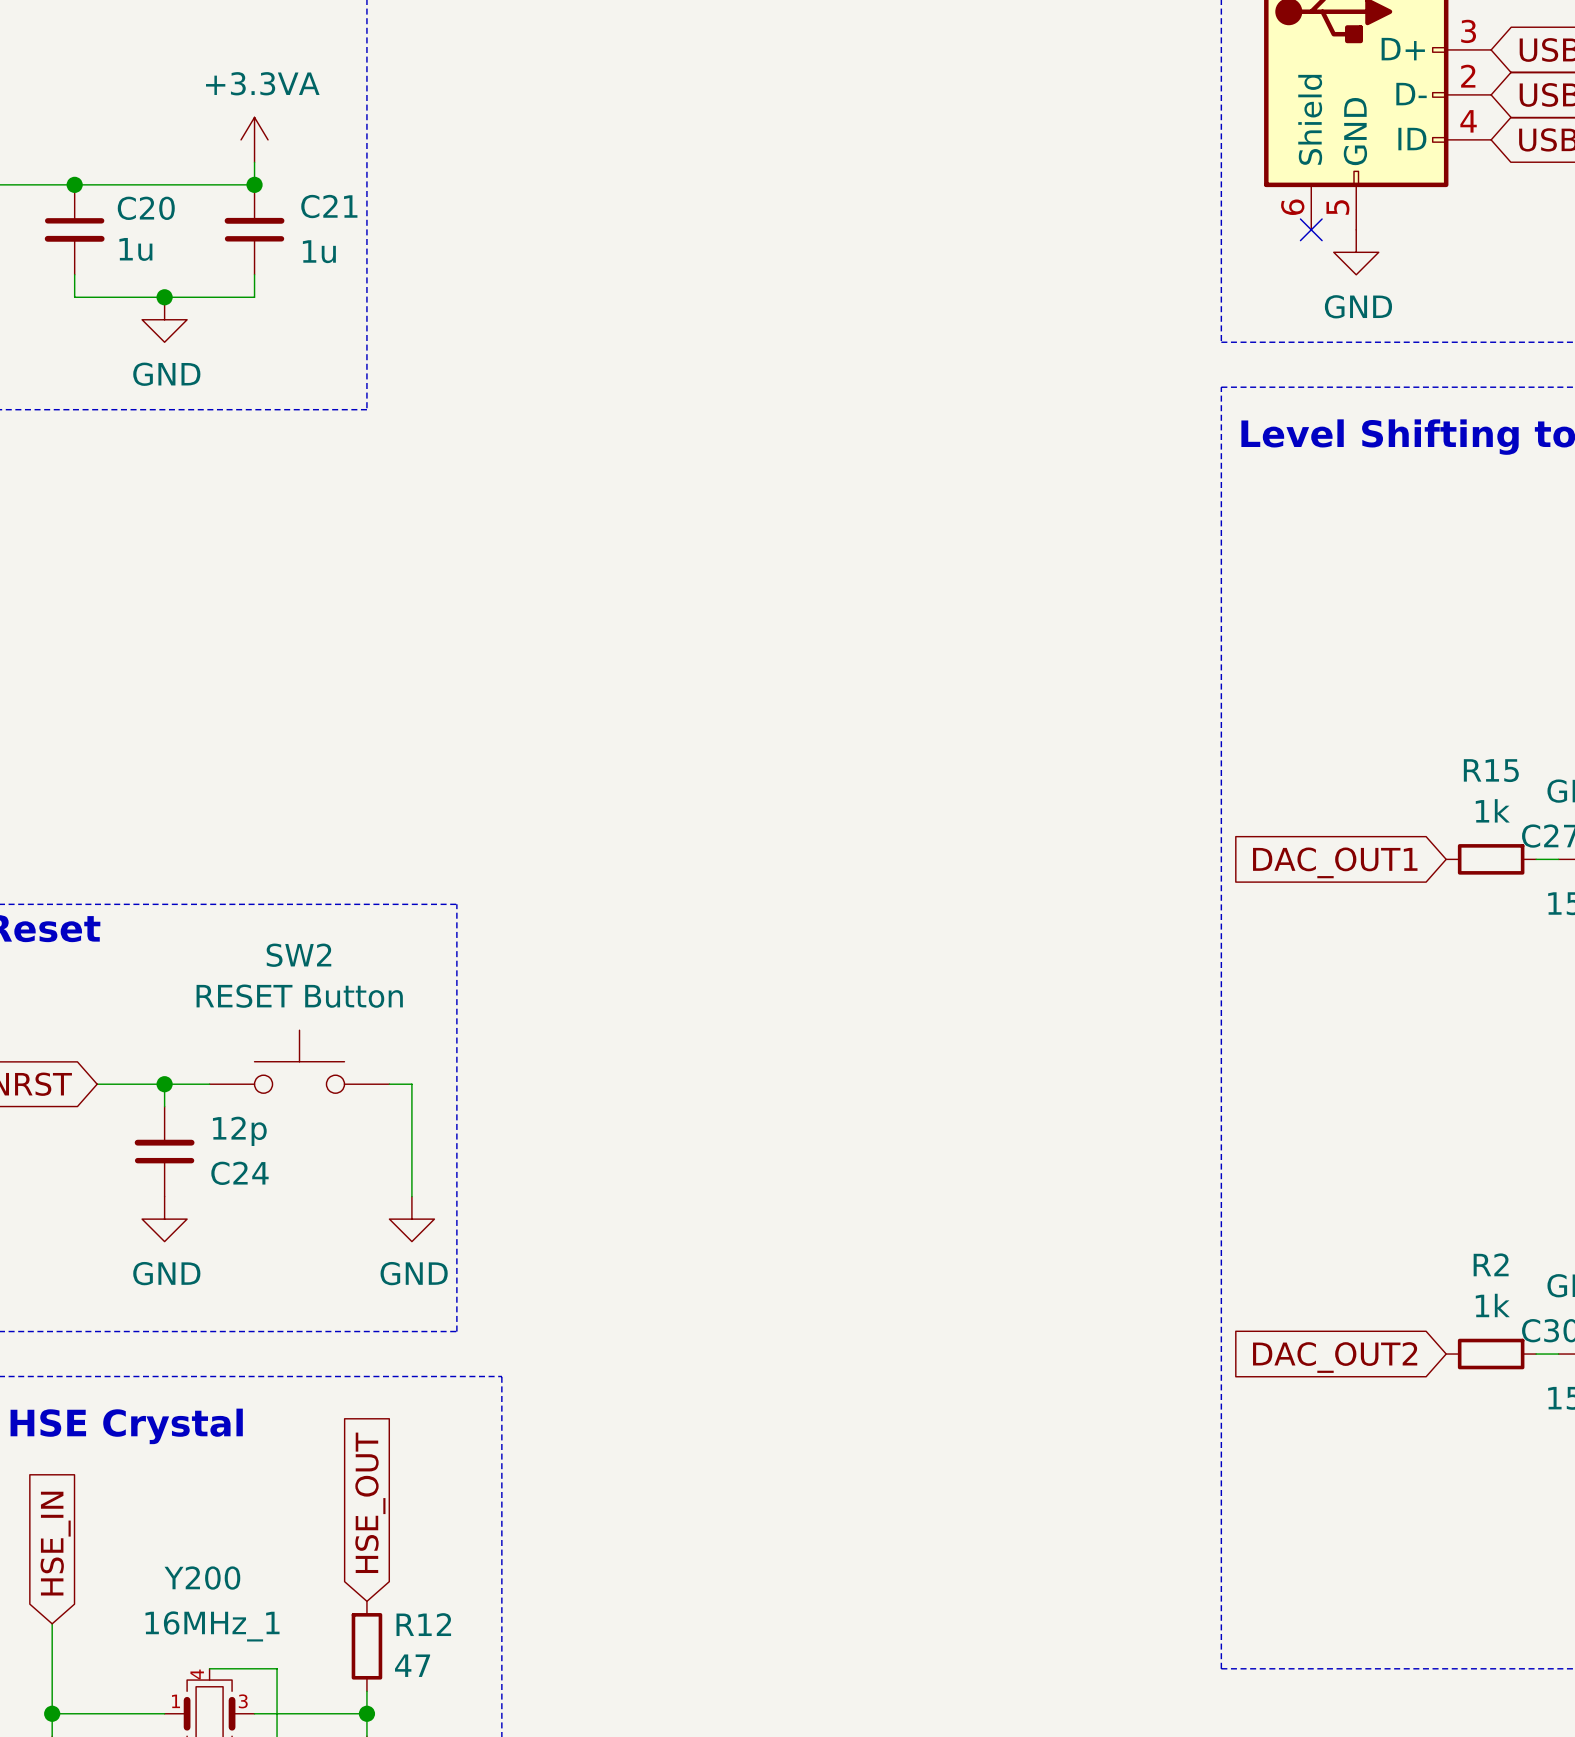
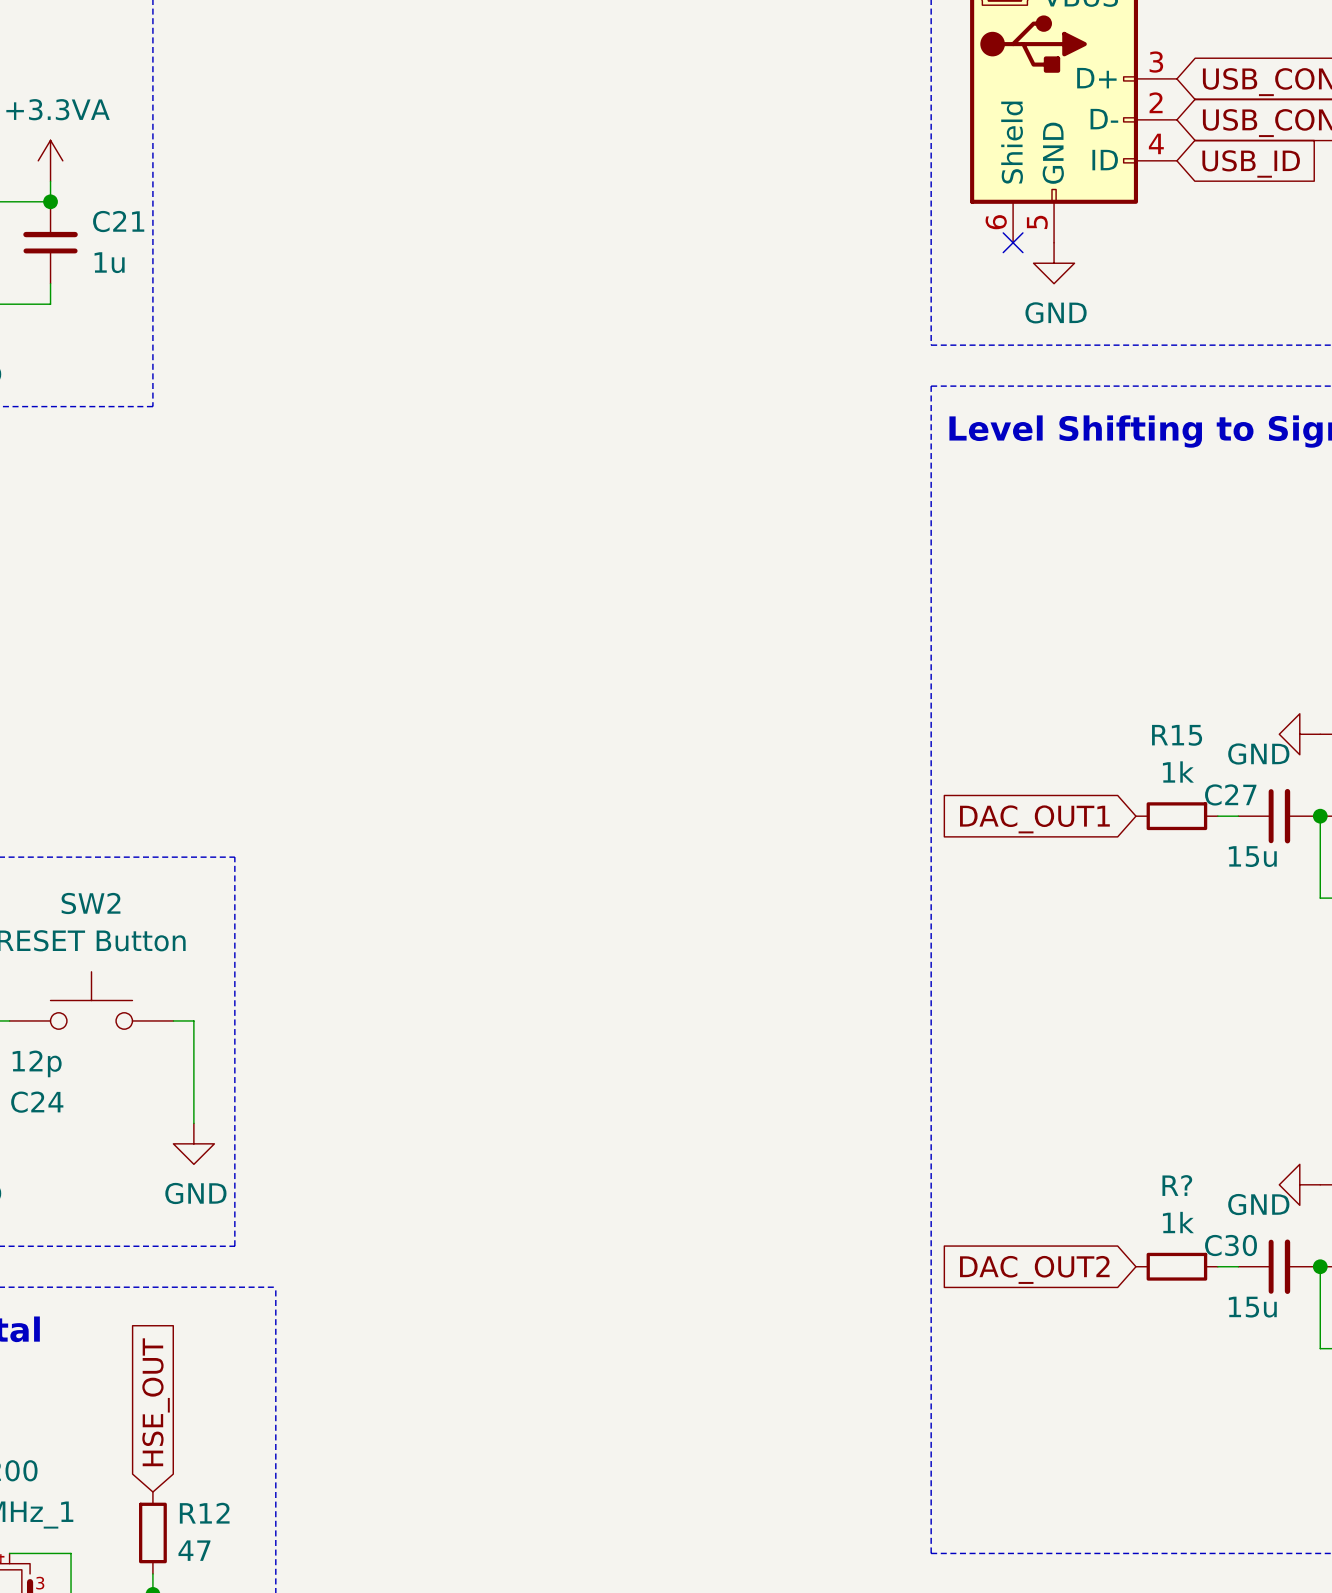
R2 name: R2 (1491, 1264) -> R? (1177, 1185)

